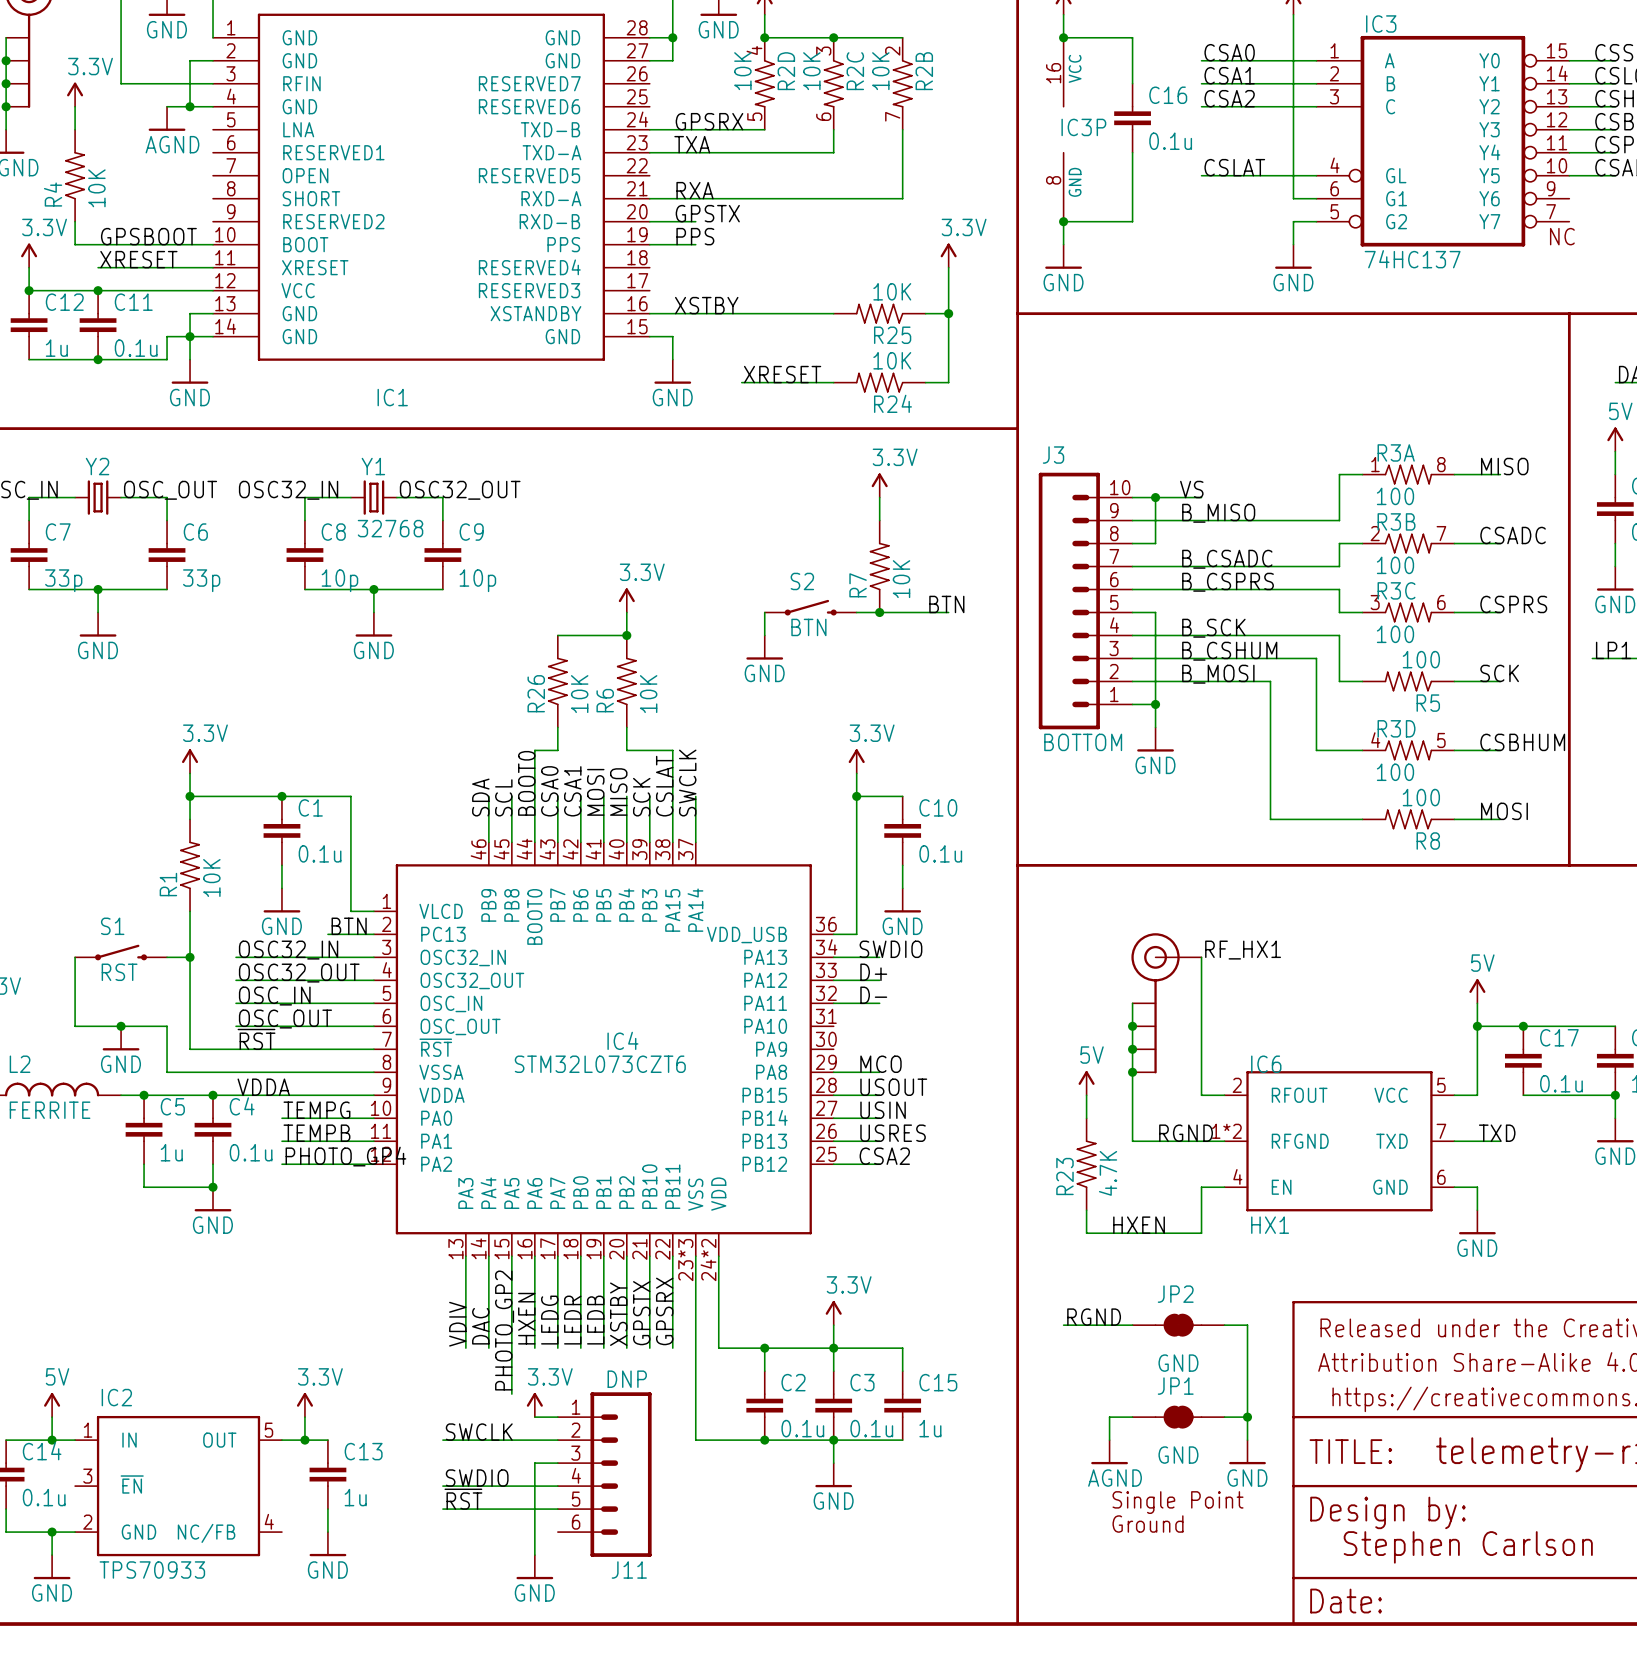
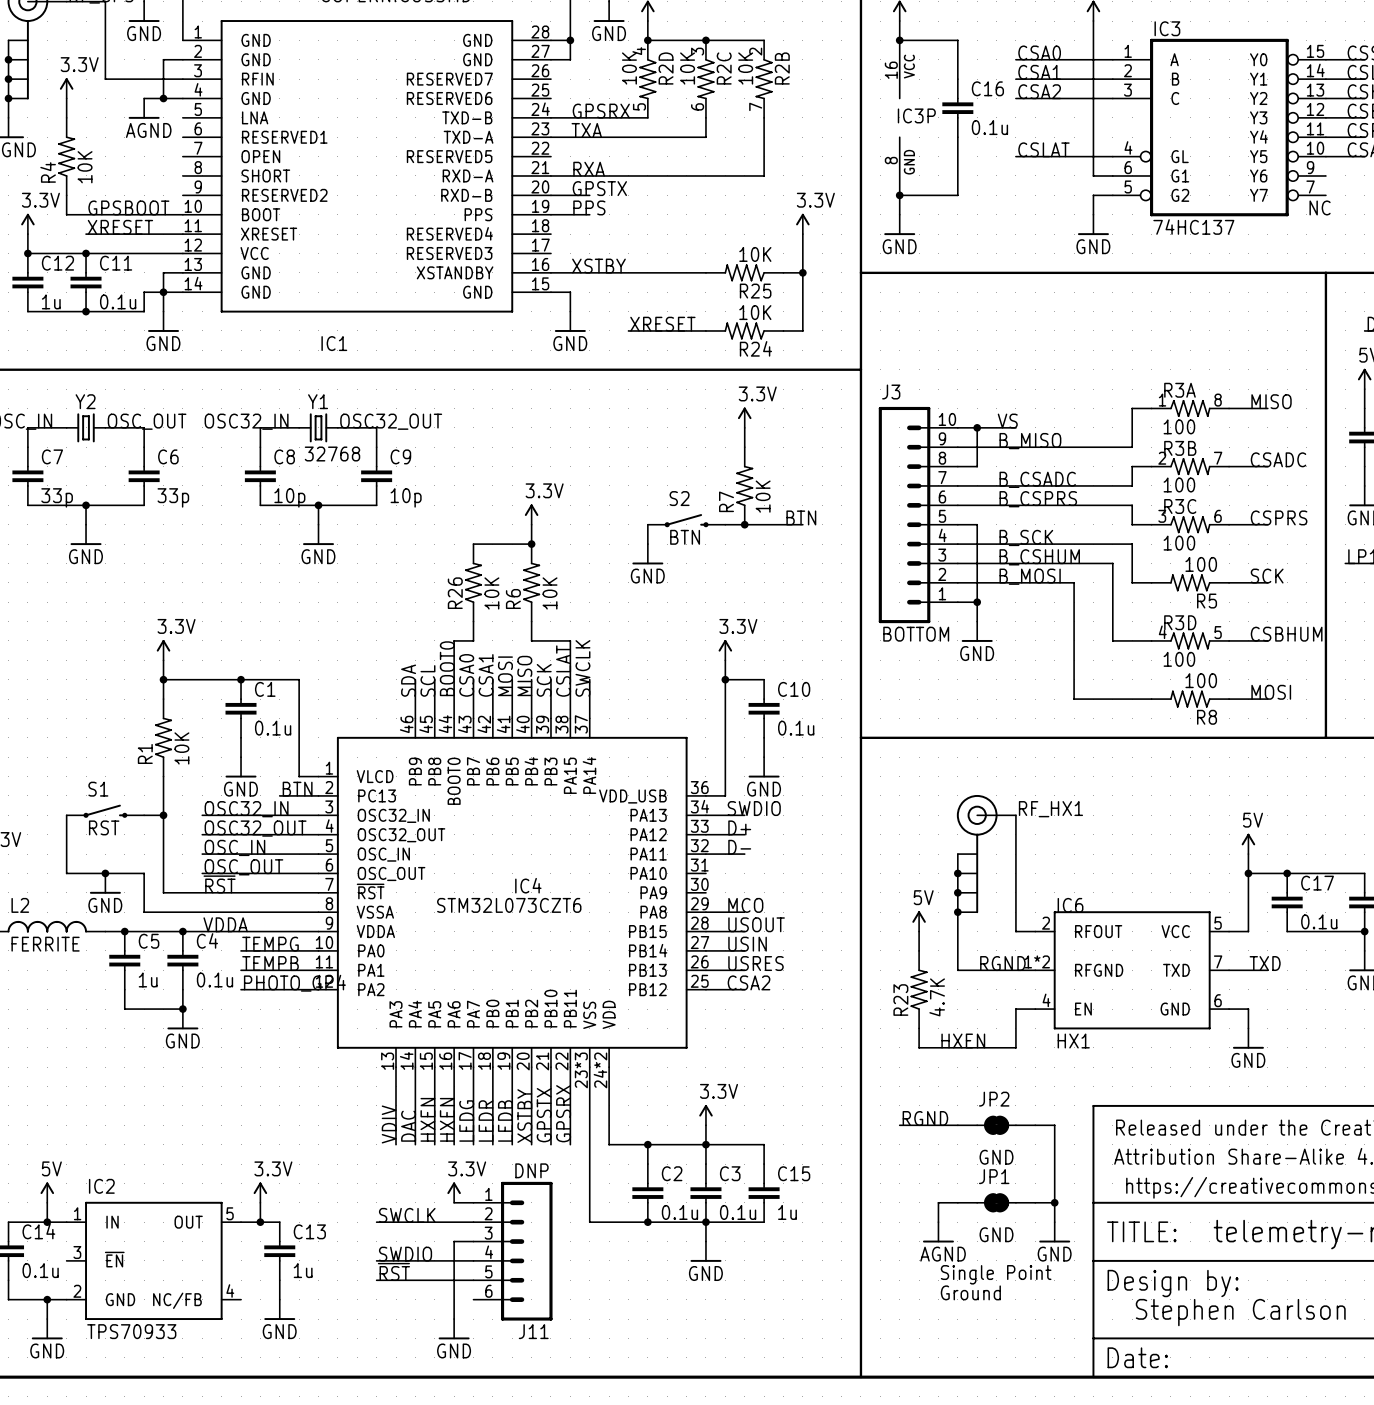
label: none -> HXEN (427, 1119)
label: PHOTO_GP2 (504, 1330) -> none
wire: (511, 1348) (511, 1394) -> none

